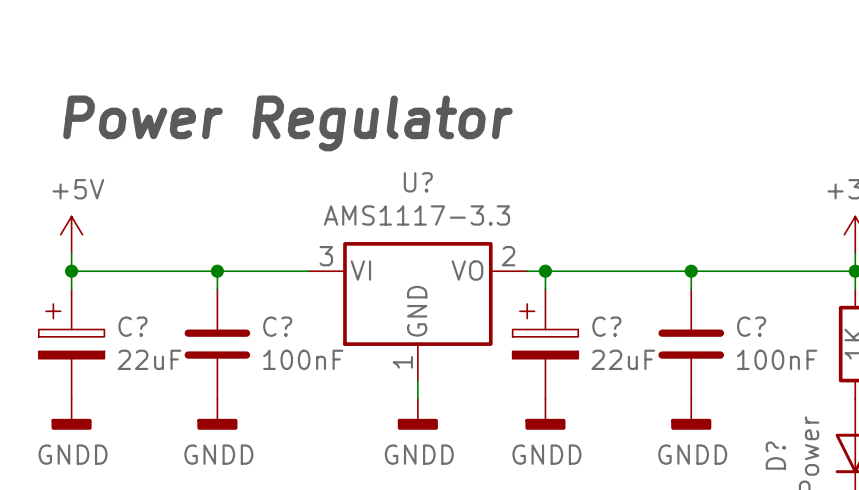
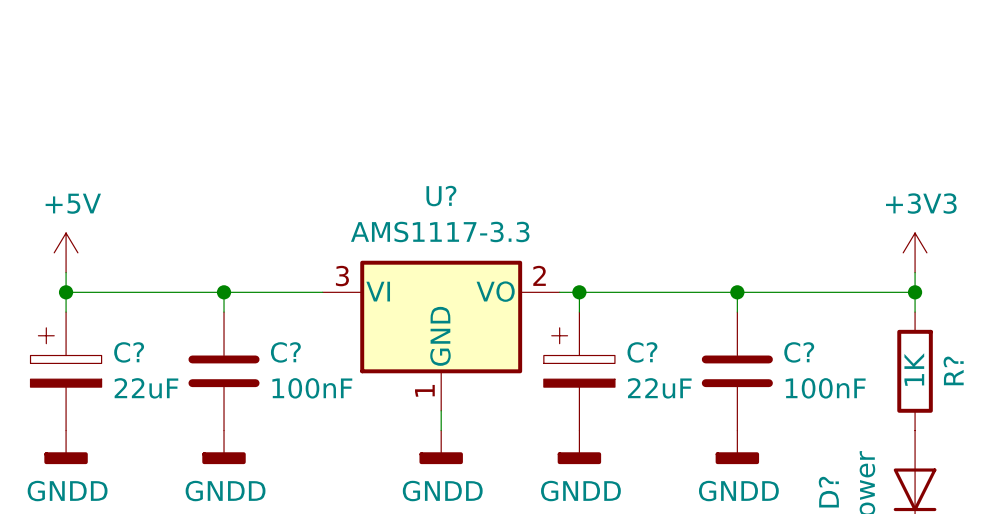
text: Power Regulator (287, 123) -> none

